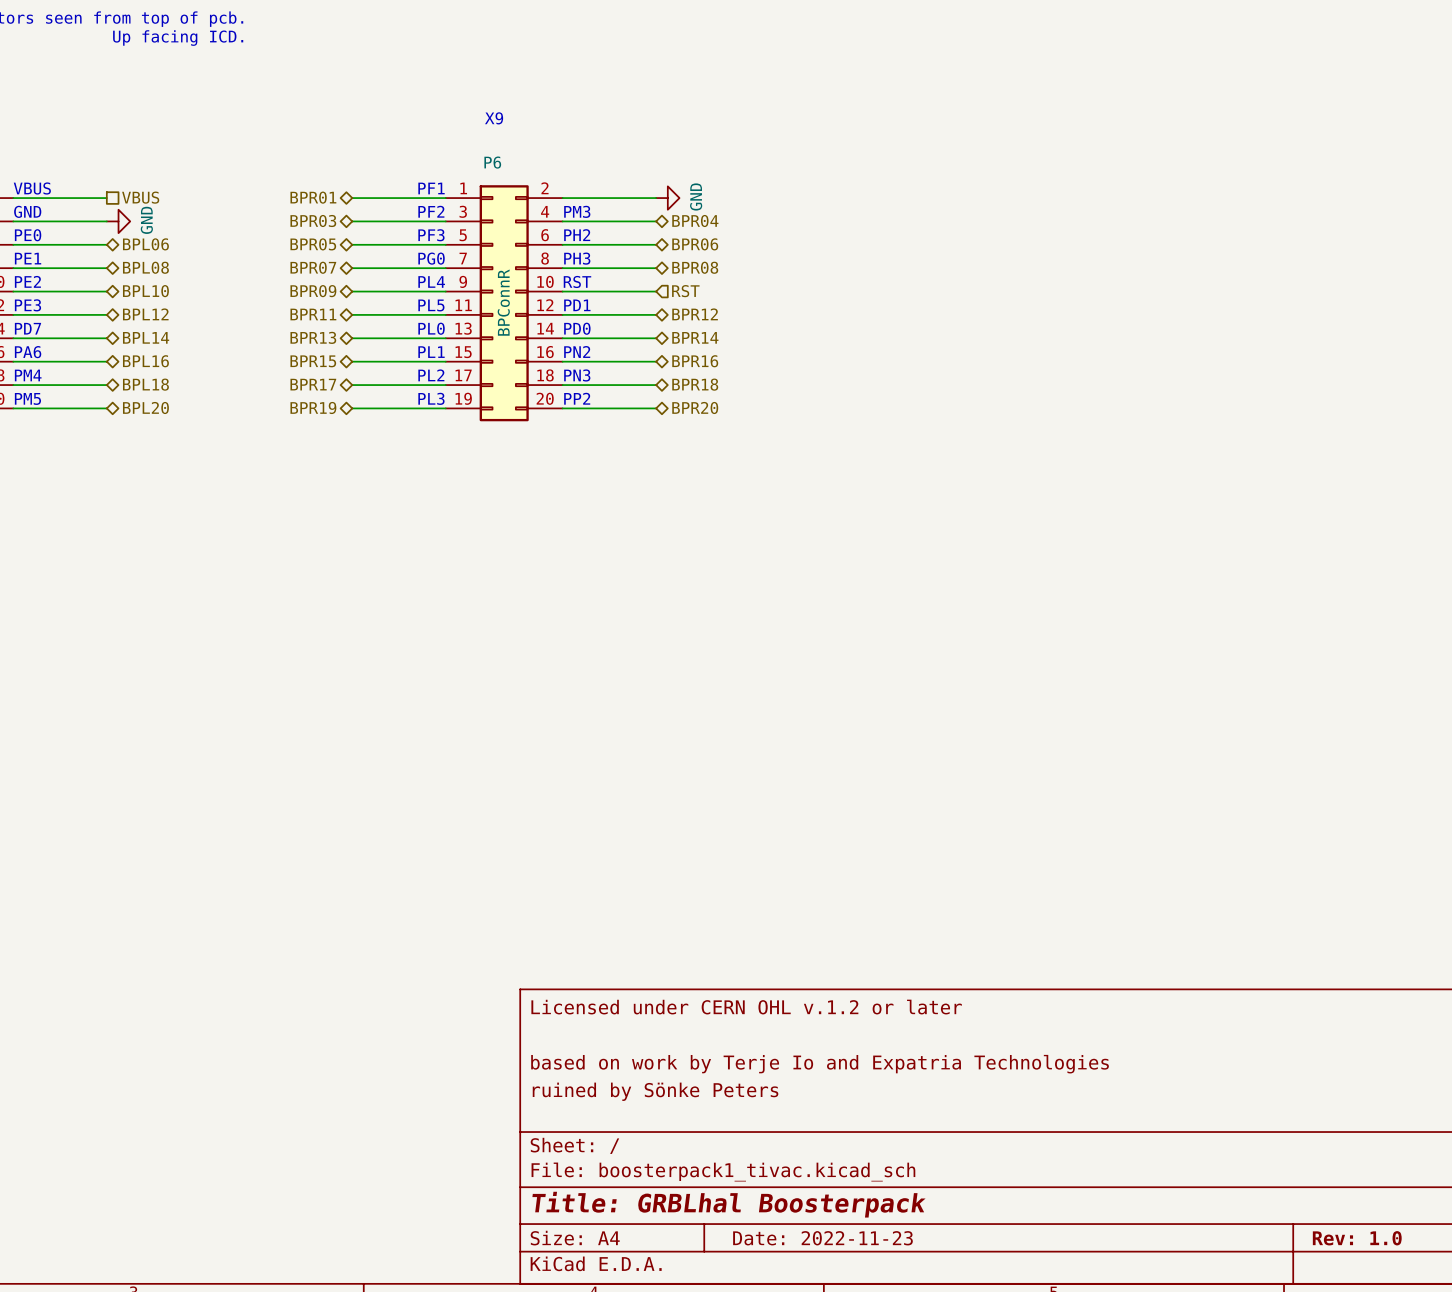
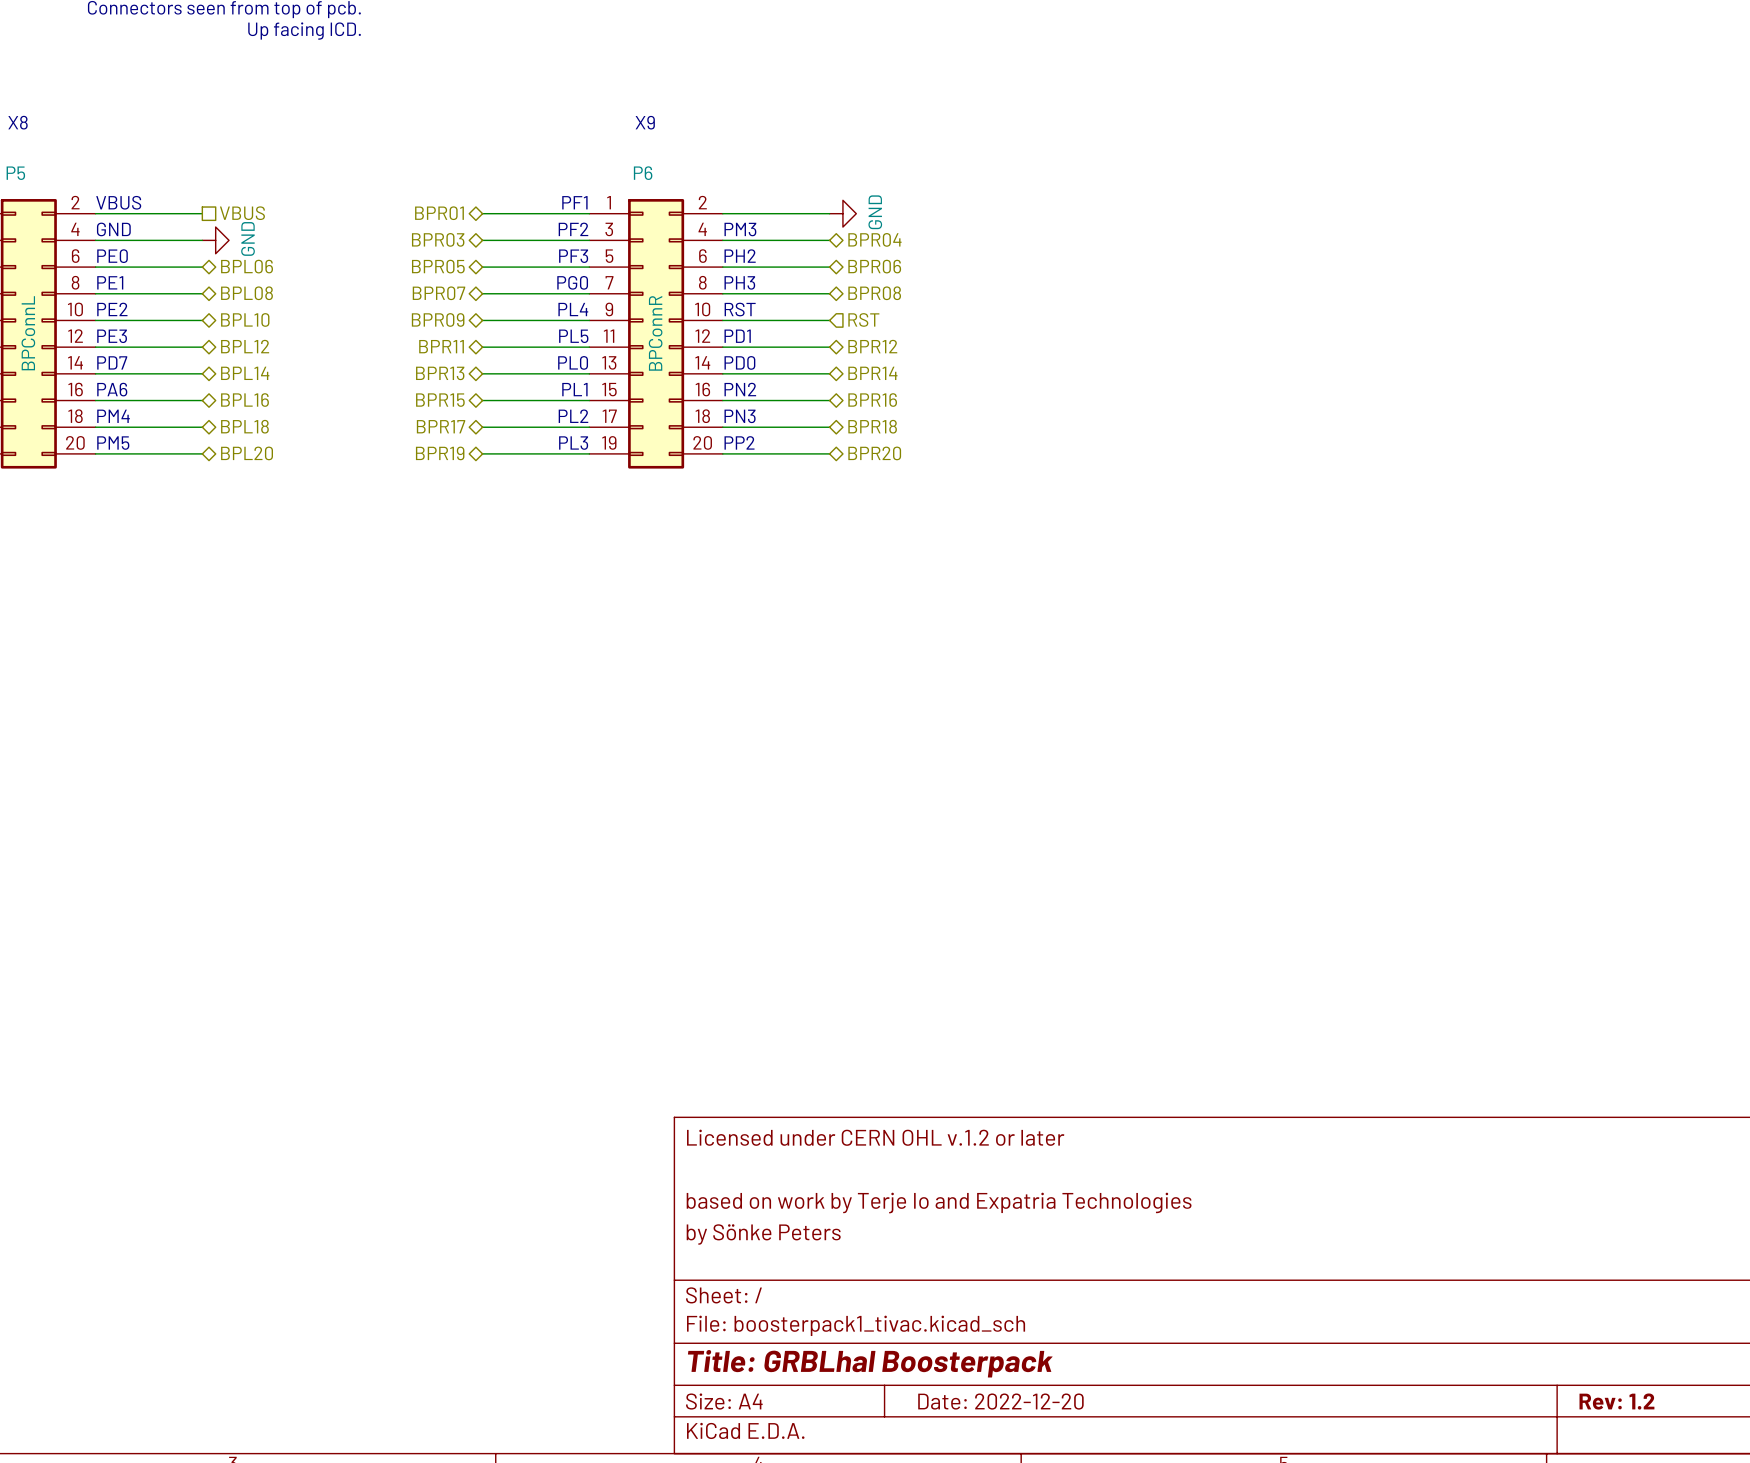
title block: ruined by Sönke Peters (655, 1091) -> by Sönke Peters (763, 1234)
title block: Date: 2022-11-23 (822, 1238) -> Date: 2022-12-20 (1000, 1401)
title block: Rev: 1.0 (1357, 1238) -> Rev: 1.2 (1616, 1401)

